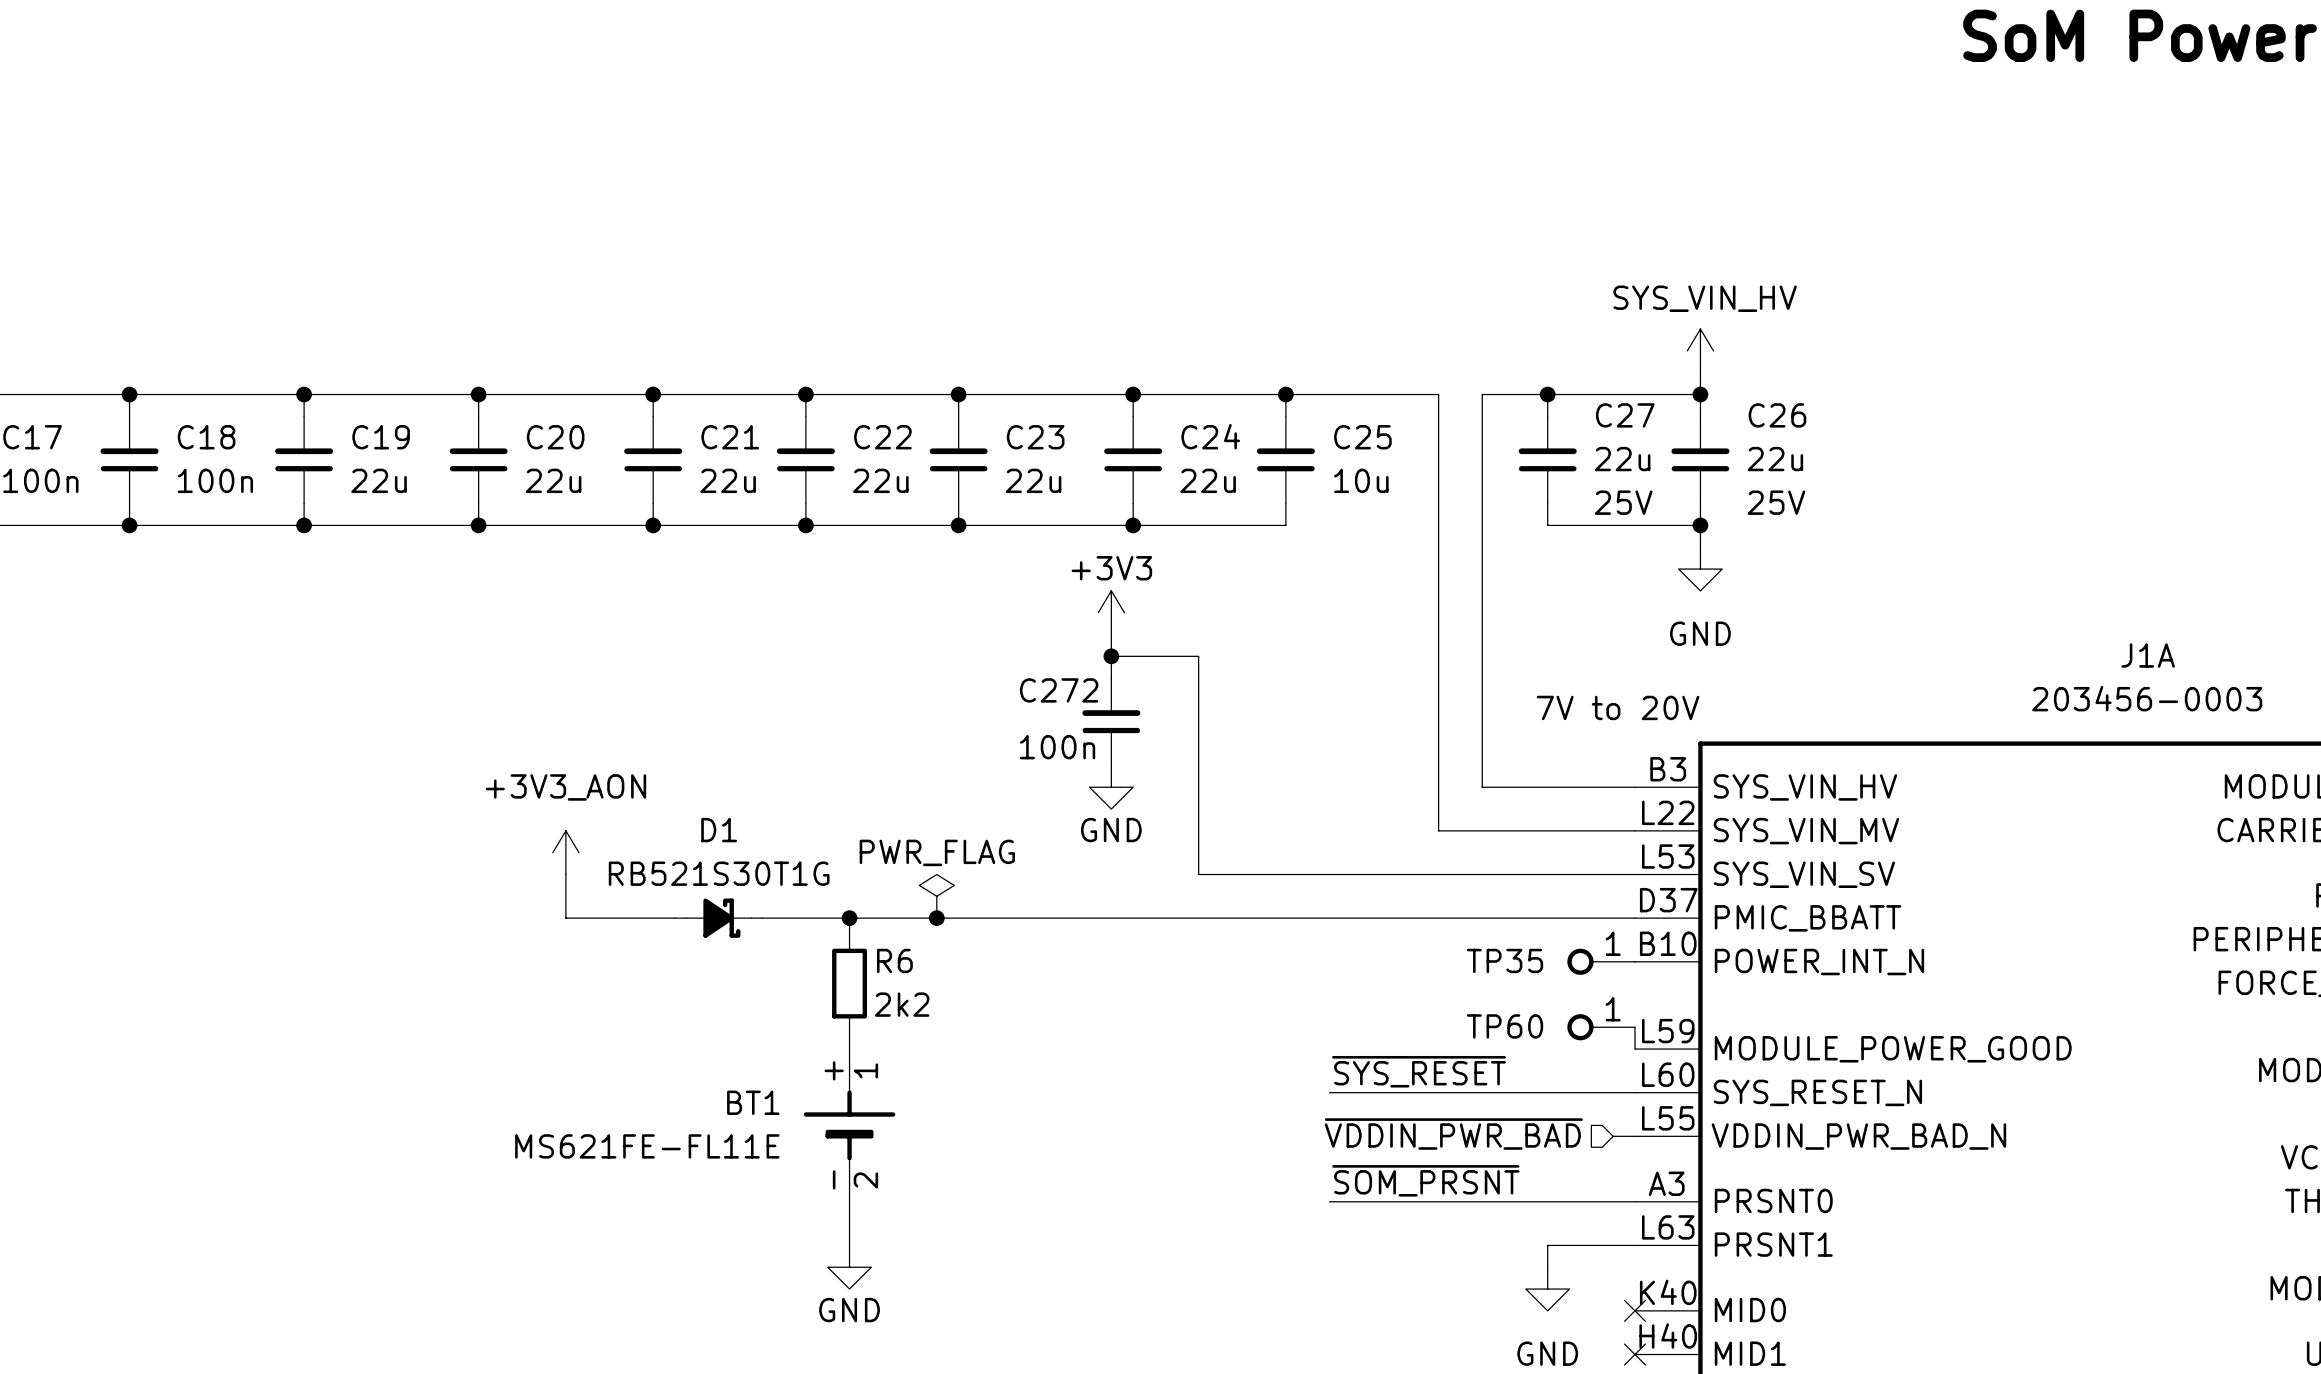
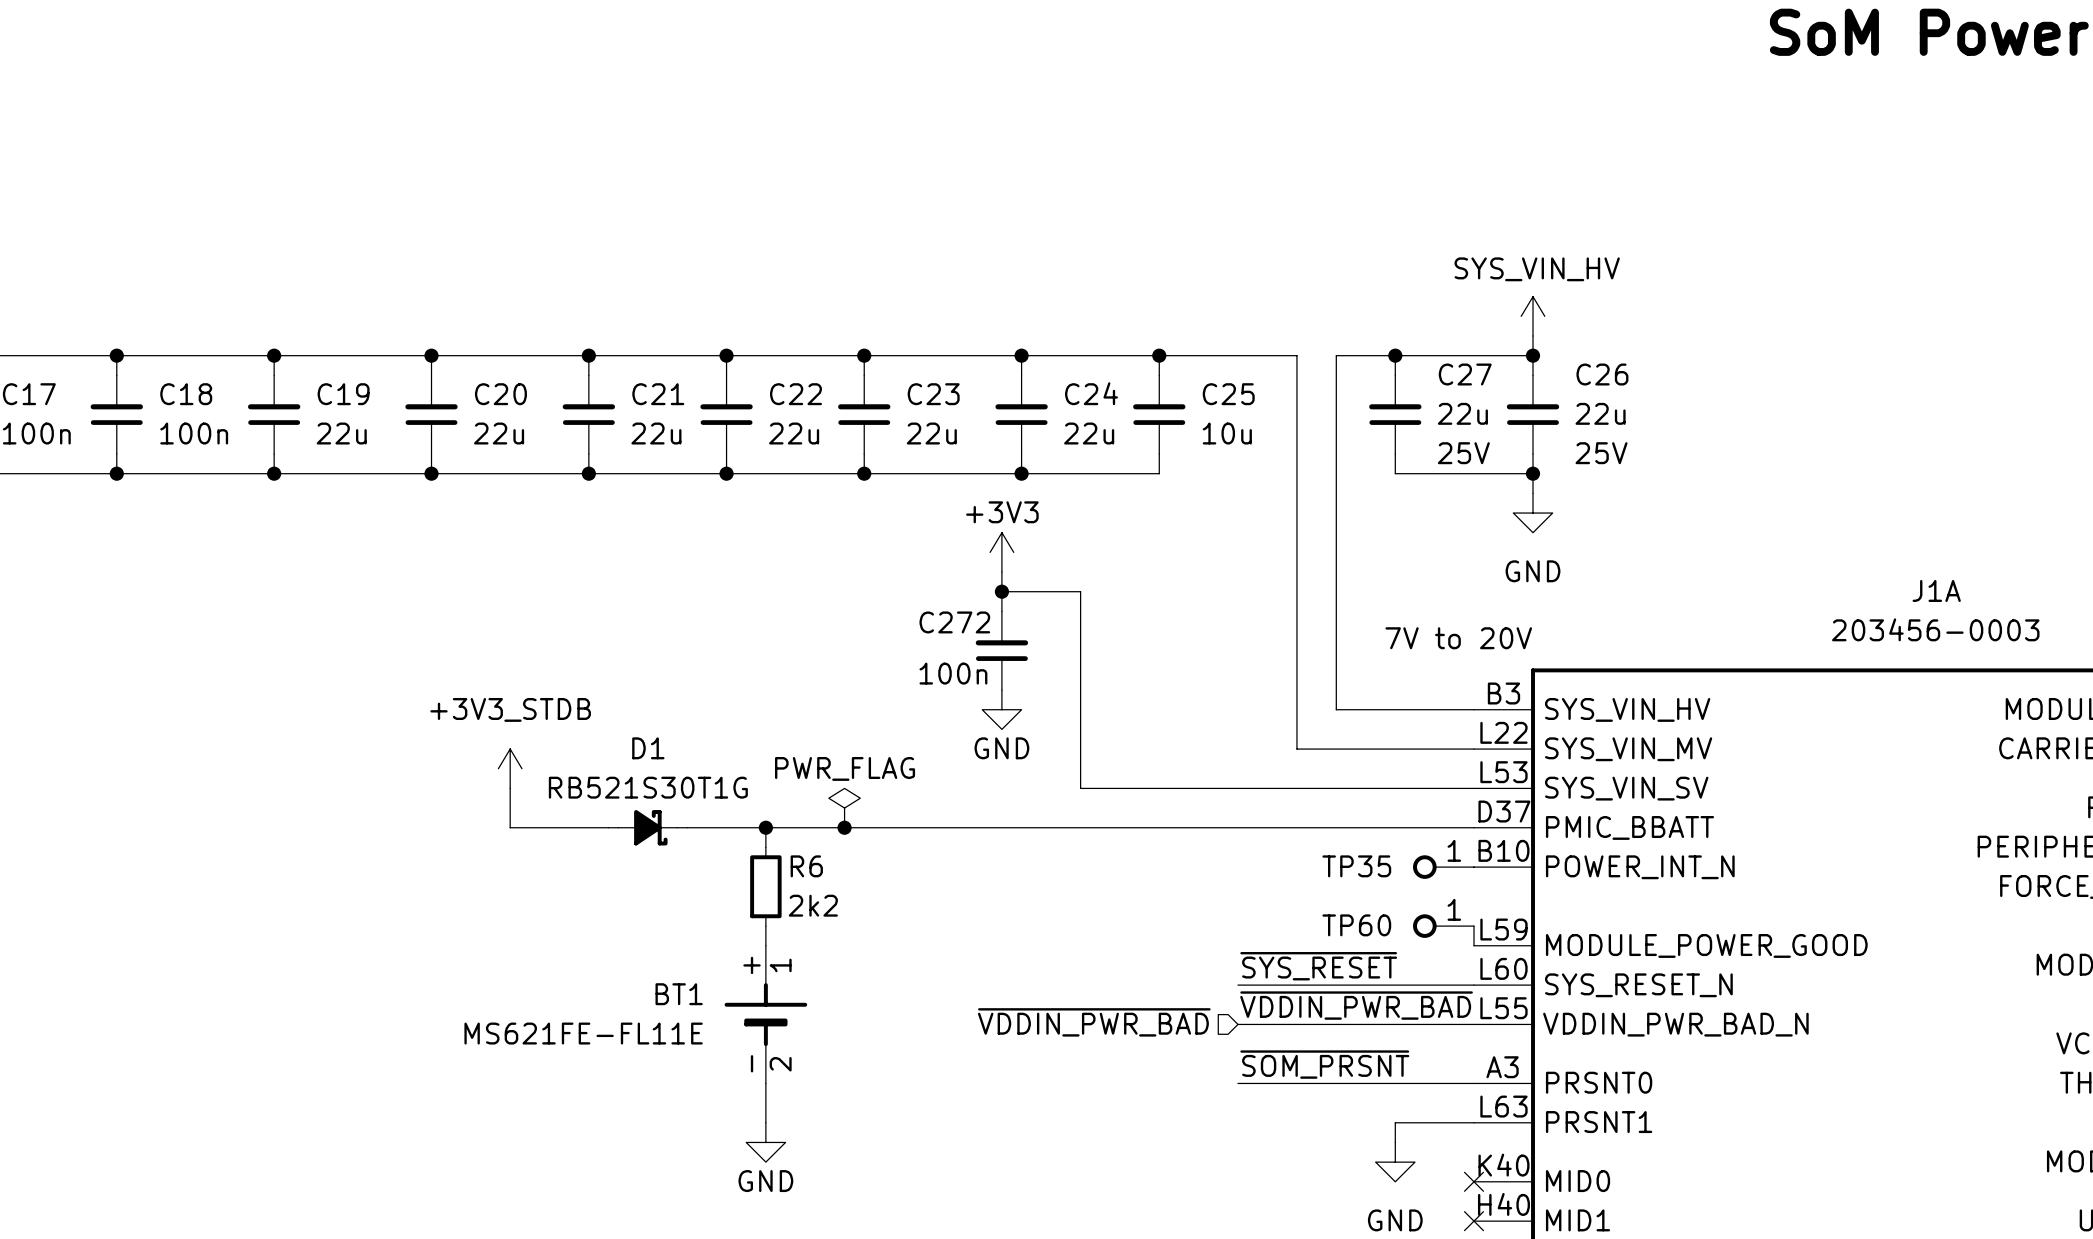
power symbol: +3V3_AON (565, 852) -> +3V3_STDB (510, 768)
label position: ~{SYS_RESET} (1419, 1071) -> ~{SYS_RESET} (1318, 966)
wire: (1329, 1092) (1373, 1092) -> none
label: none -> ~{VDDIN_PWR_BAD} (1356, 1005)
hierarchical label position: ~{VDDIN_PWR_BAD} (1453, 1134) -> ~{VDDIN_PWR_BAD} (1094, 1022)
wire: none -> (1237, 1024) (1454, 1024)
label position: ~{SOM_PRSNT} (1425, 1180) -> ~{SOM_PRSNT} (1324, 1064)
wire: (1329, 1201) (1373, 1201) -> none

